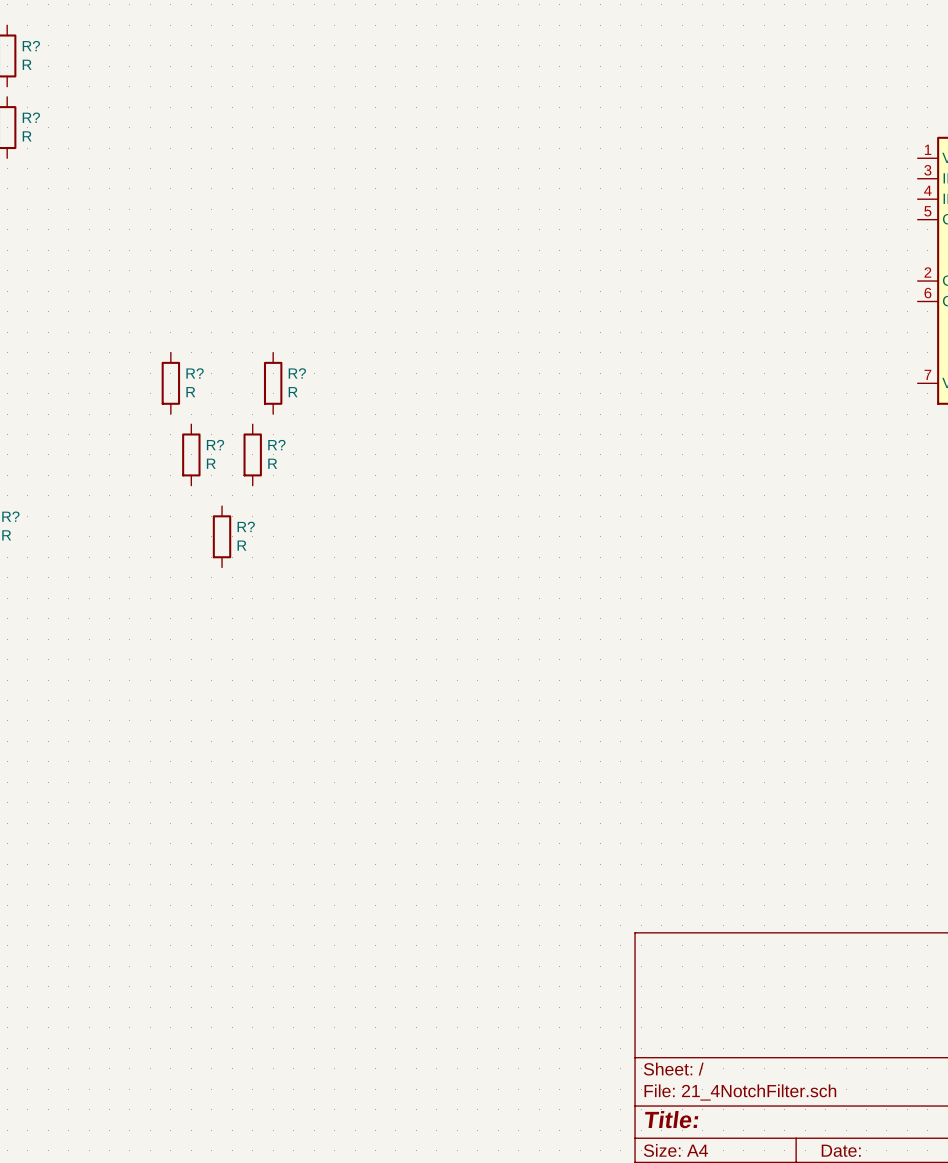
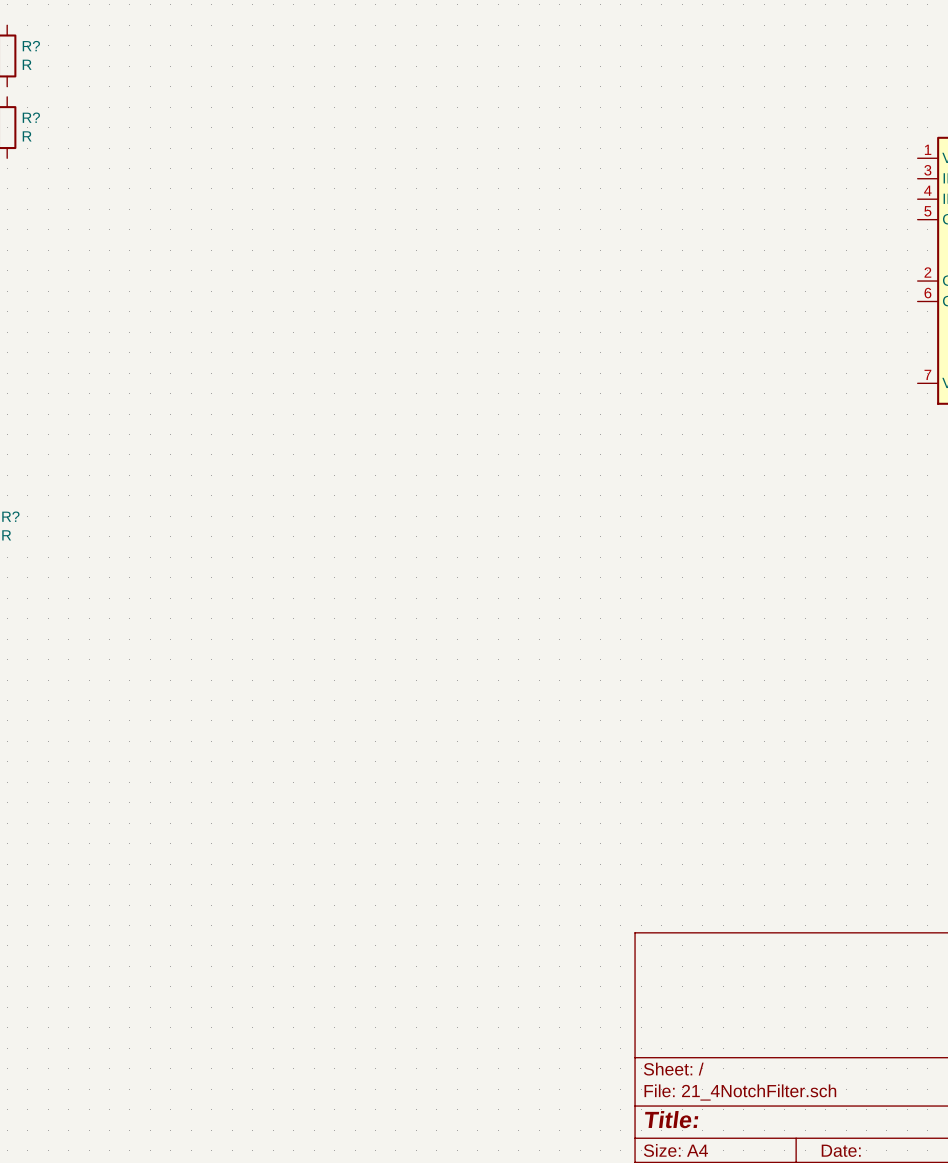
R?: R (170, 383) -> none
R?: R (273, 383) -> none
R?: R (191, 454) -> none
R?: R (252, 454) -> none
R?: R (222, 536) -> none

